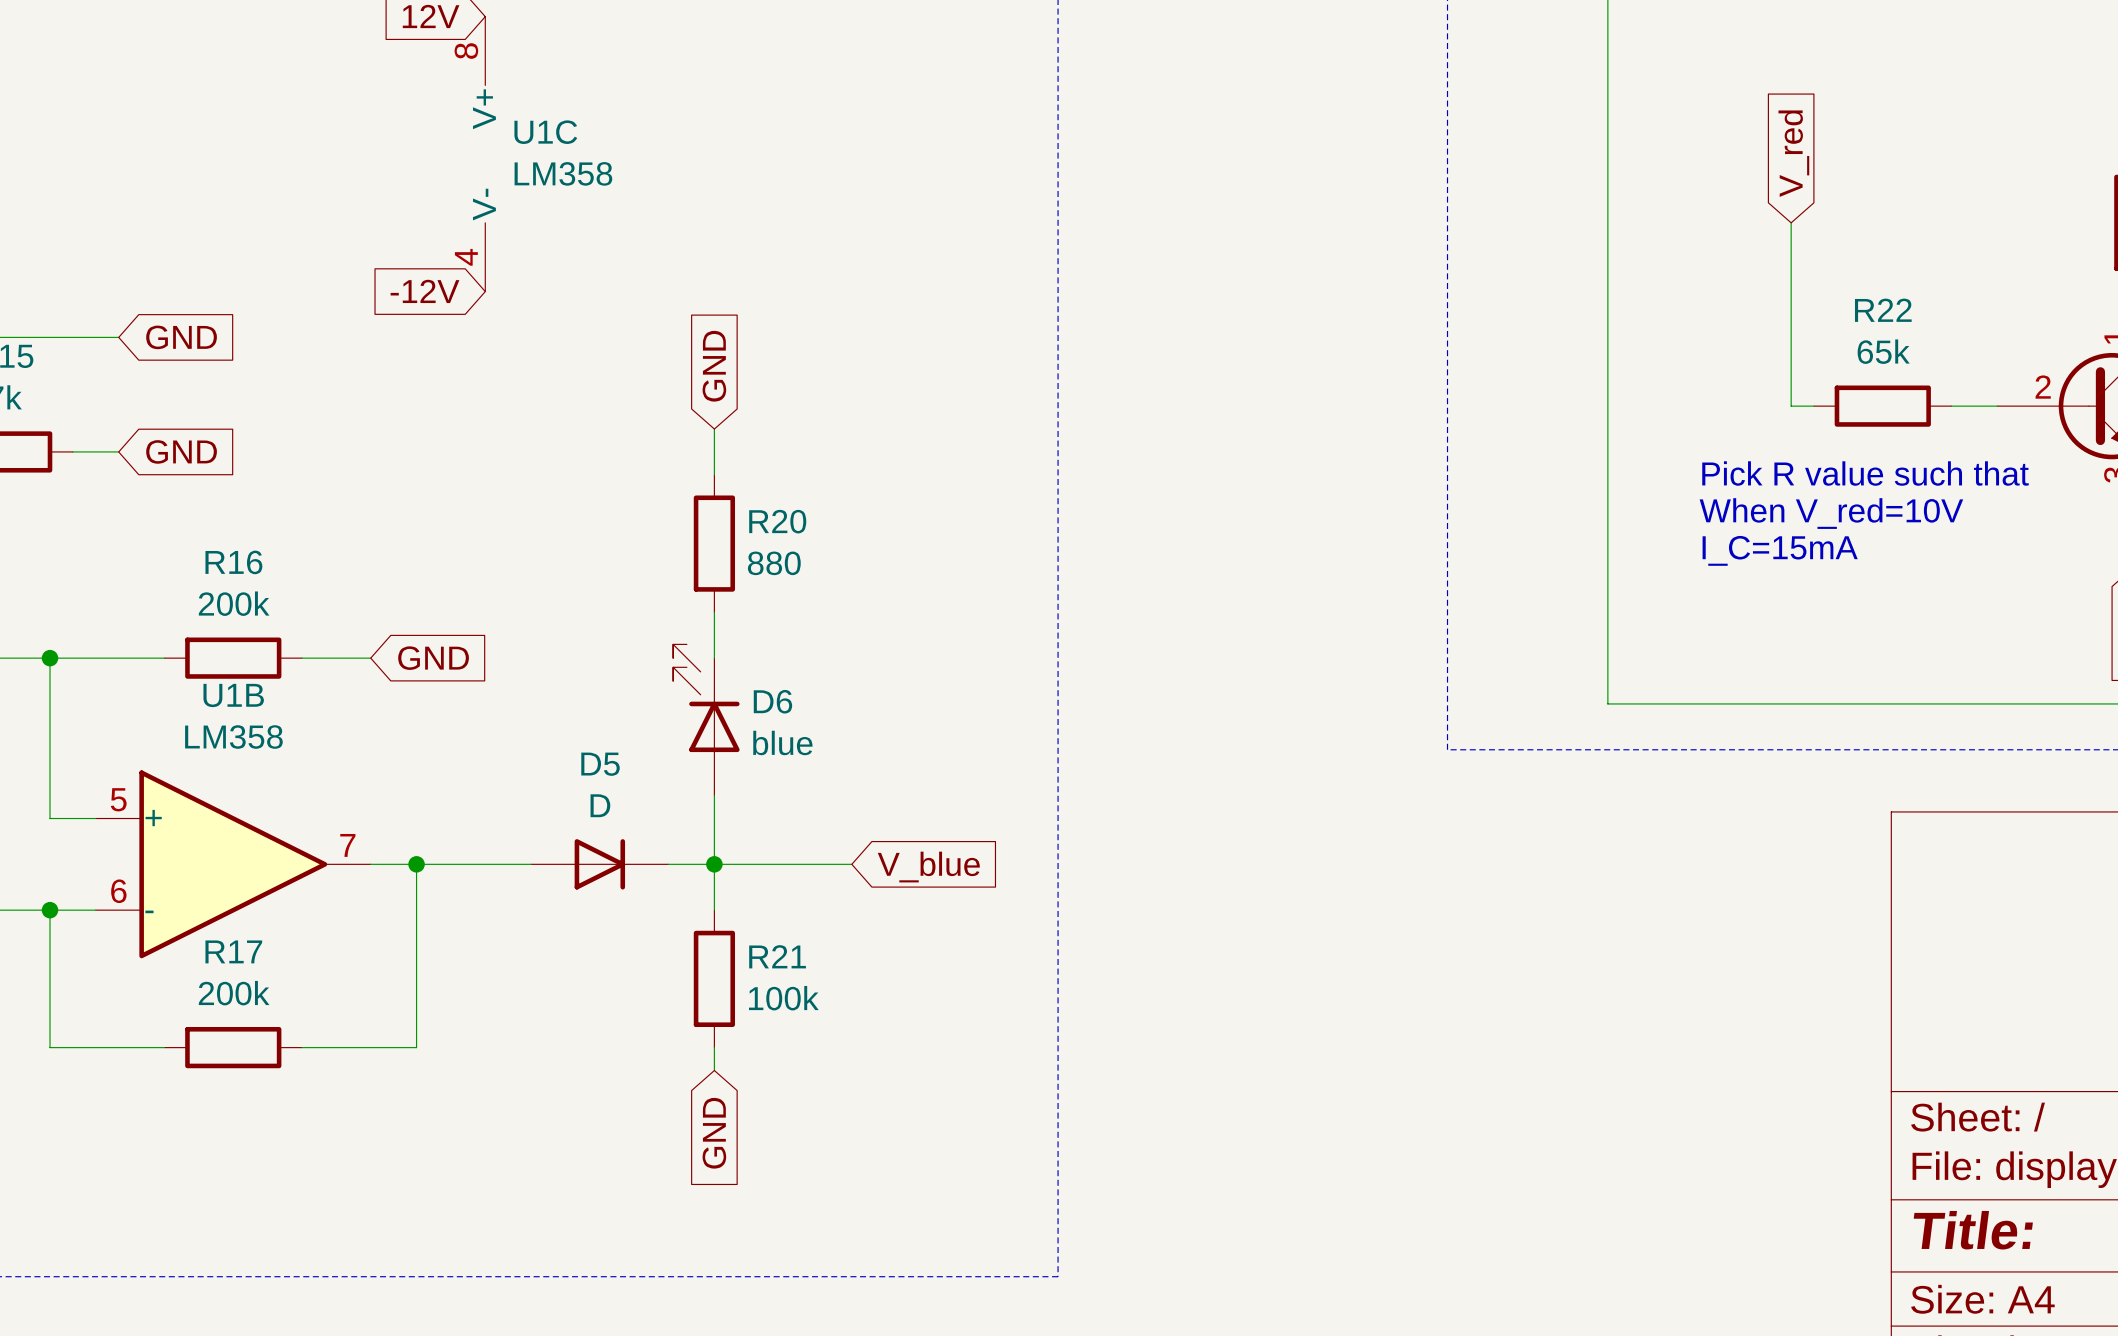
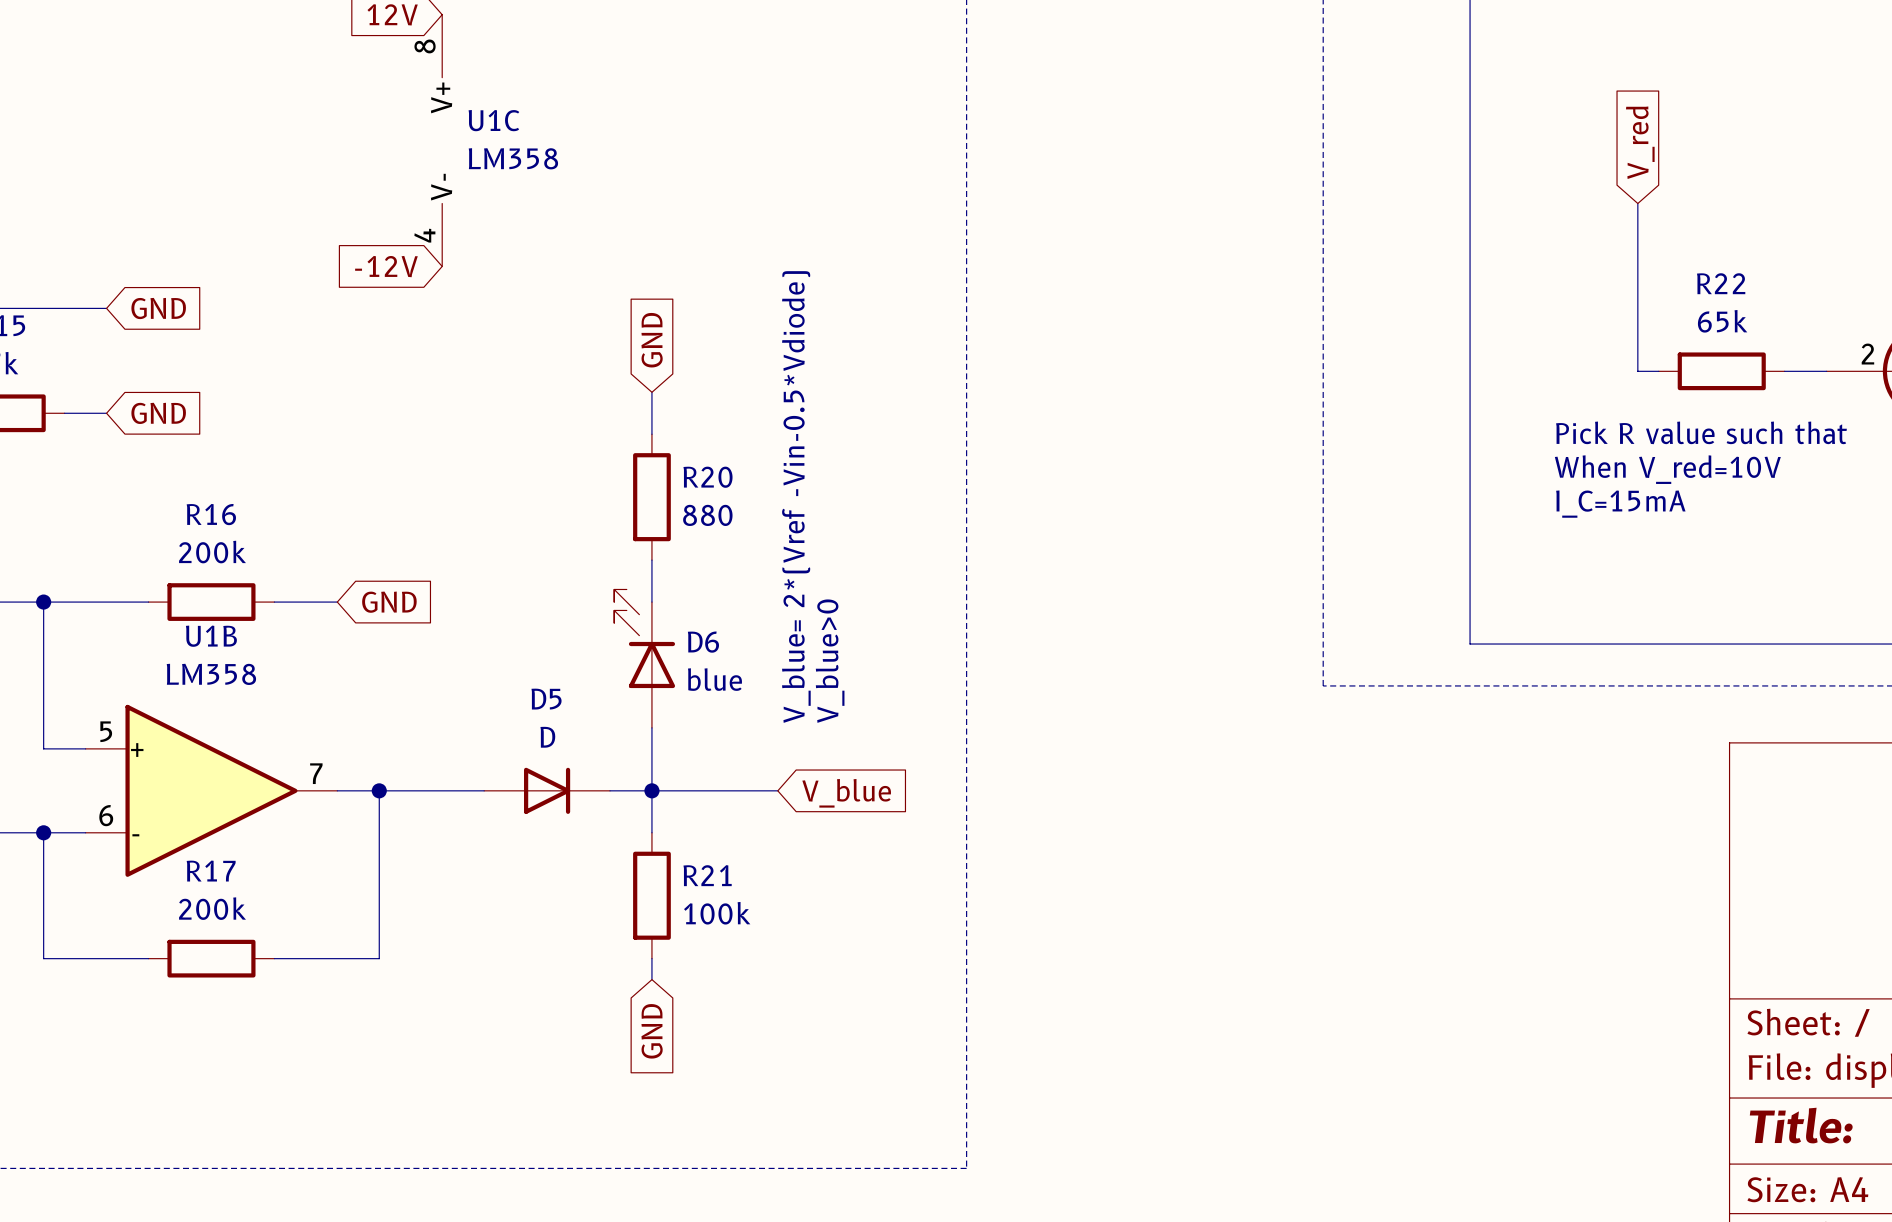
text: none -> V_blue= 2*(Vref -Vin-0.5*Vdiode) (796, 497)
text: none -> V_blue>0 (830, 661)

